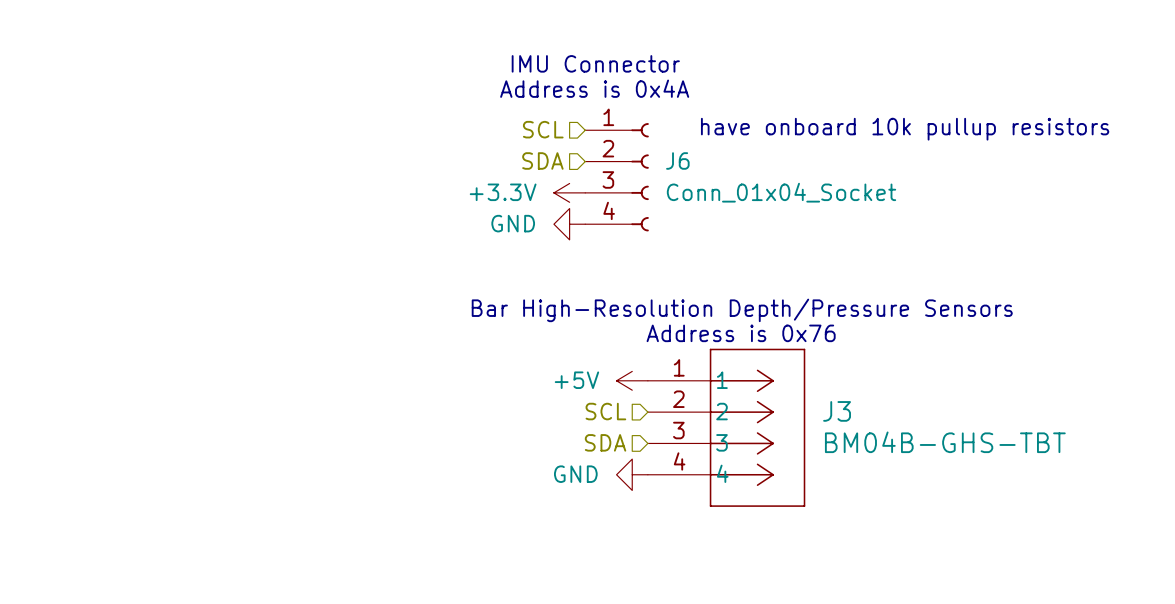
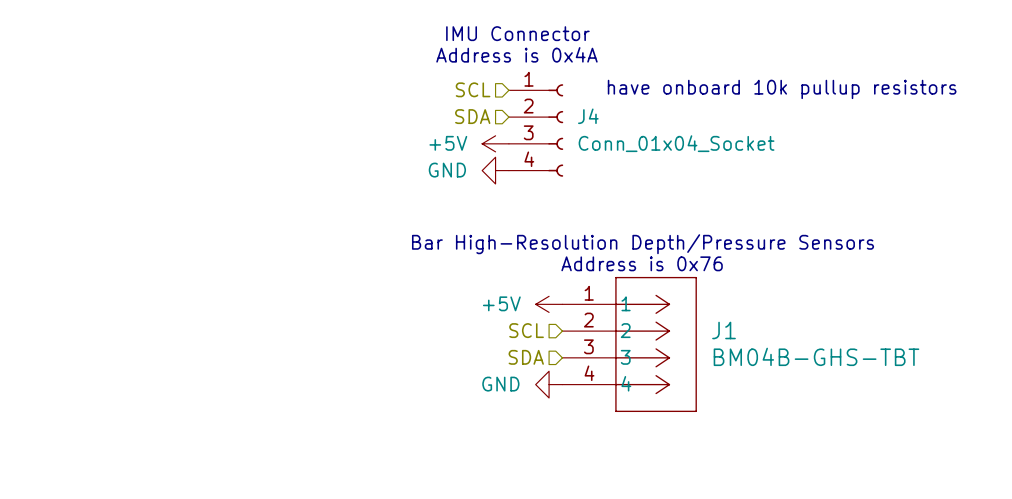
J6 name: J6 (677, 160) -> J4 (588, 116)
power symbol: +3.3V (569, 192) -> +5V (495, 143)
J3 name: J3 (837, 411) -> J1 (724, 330)

